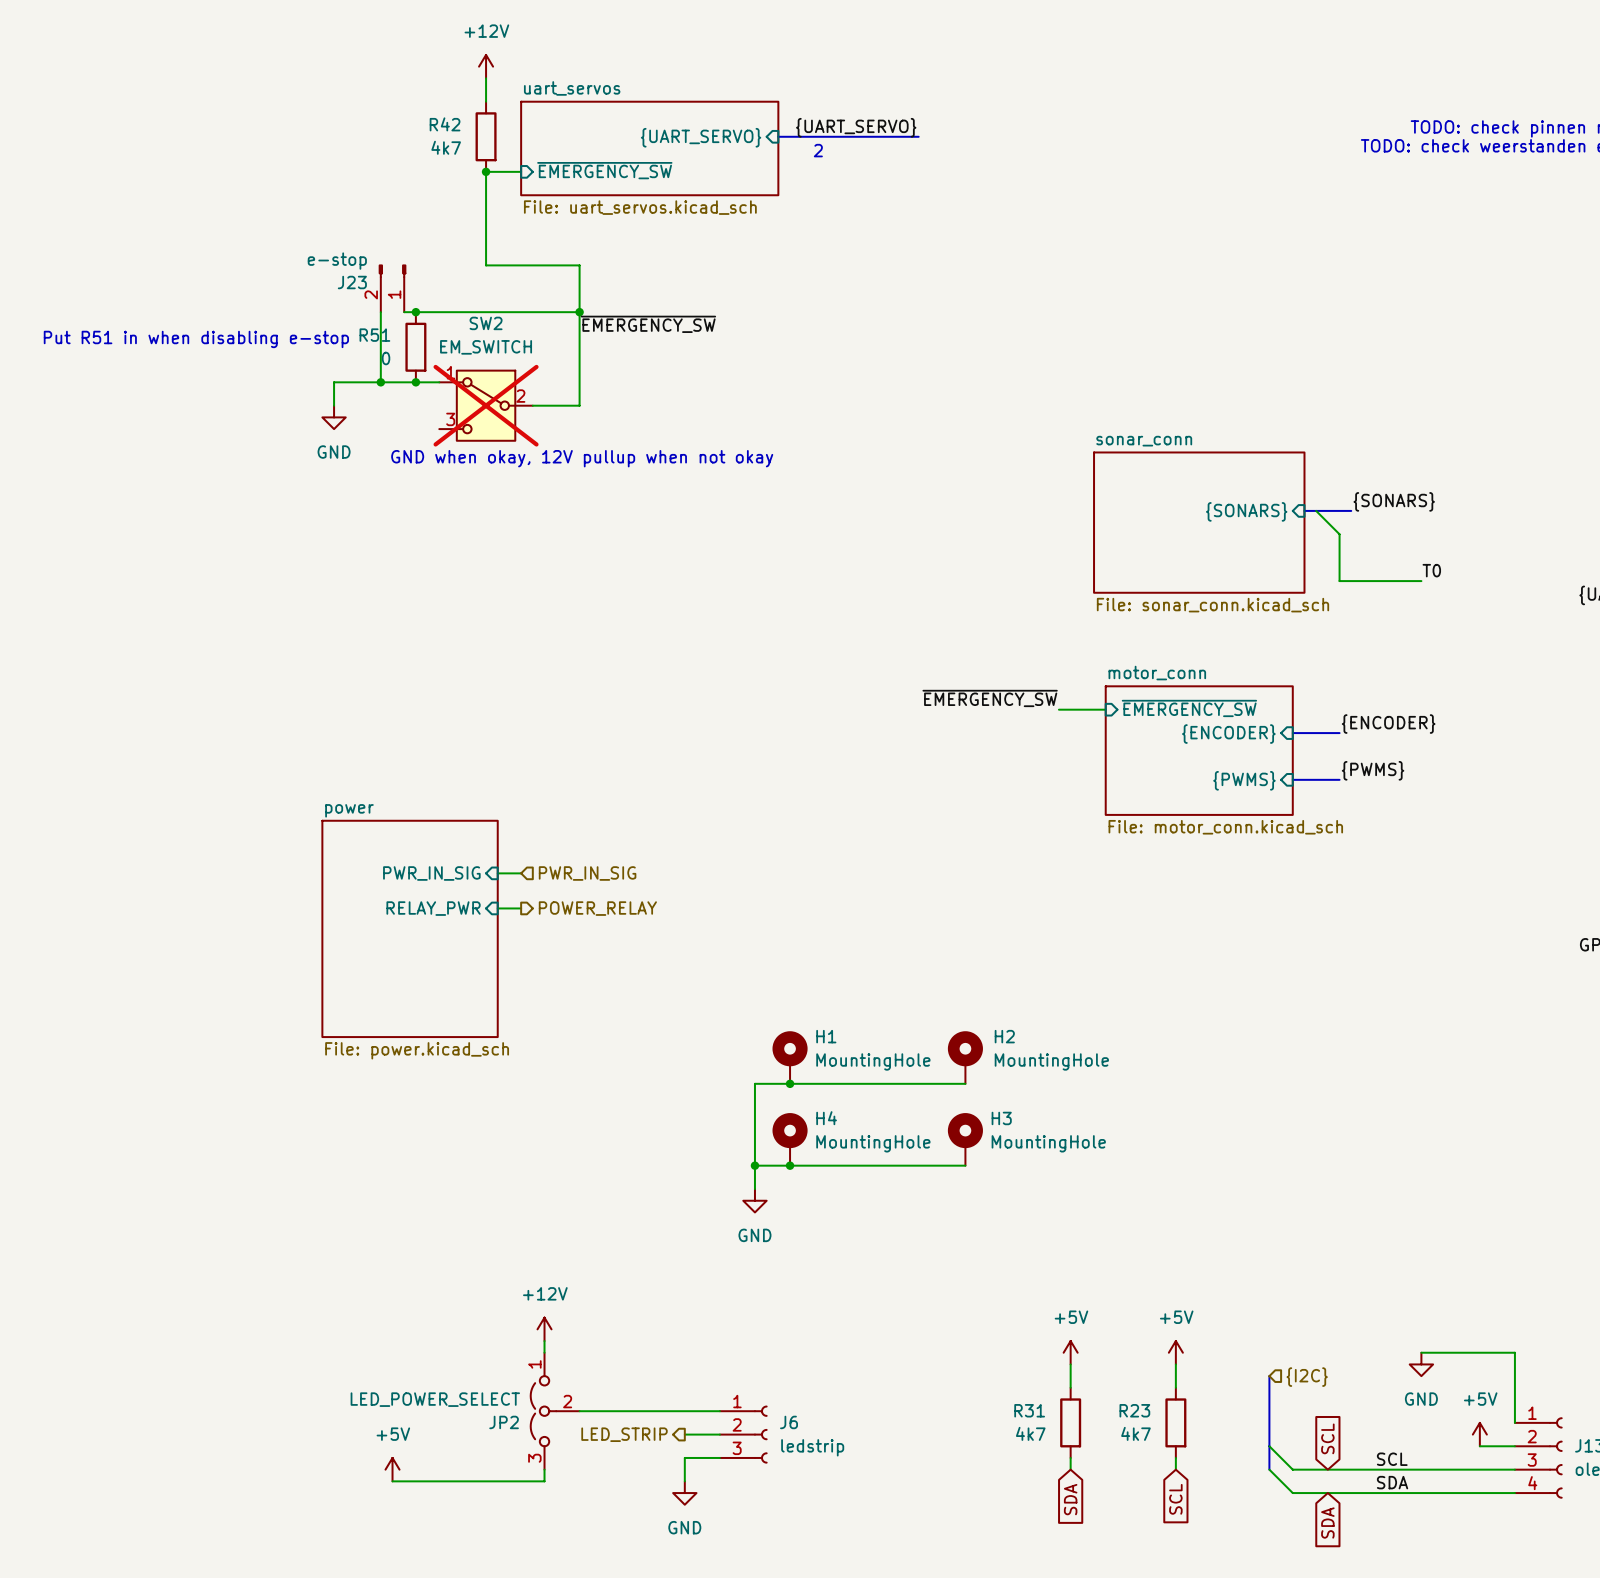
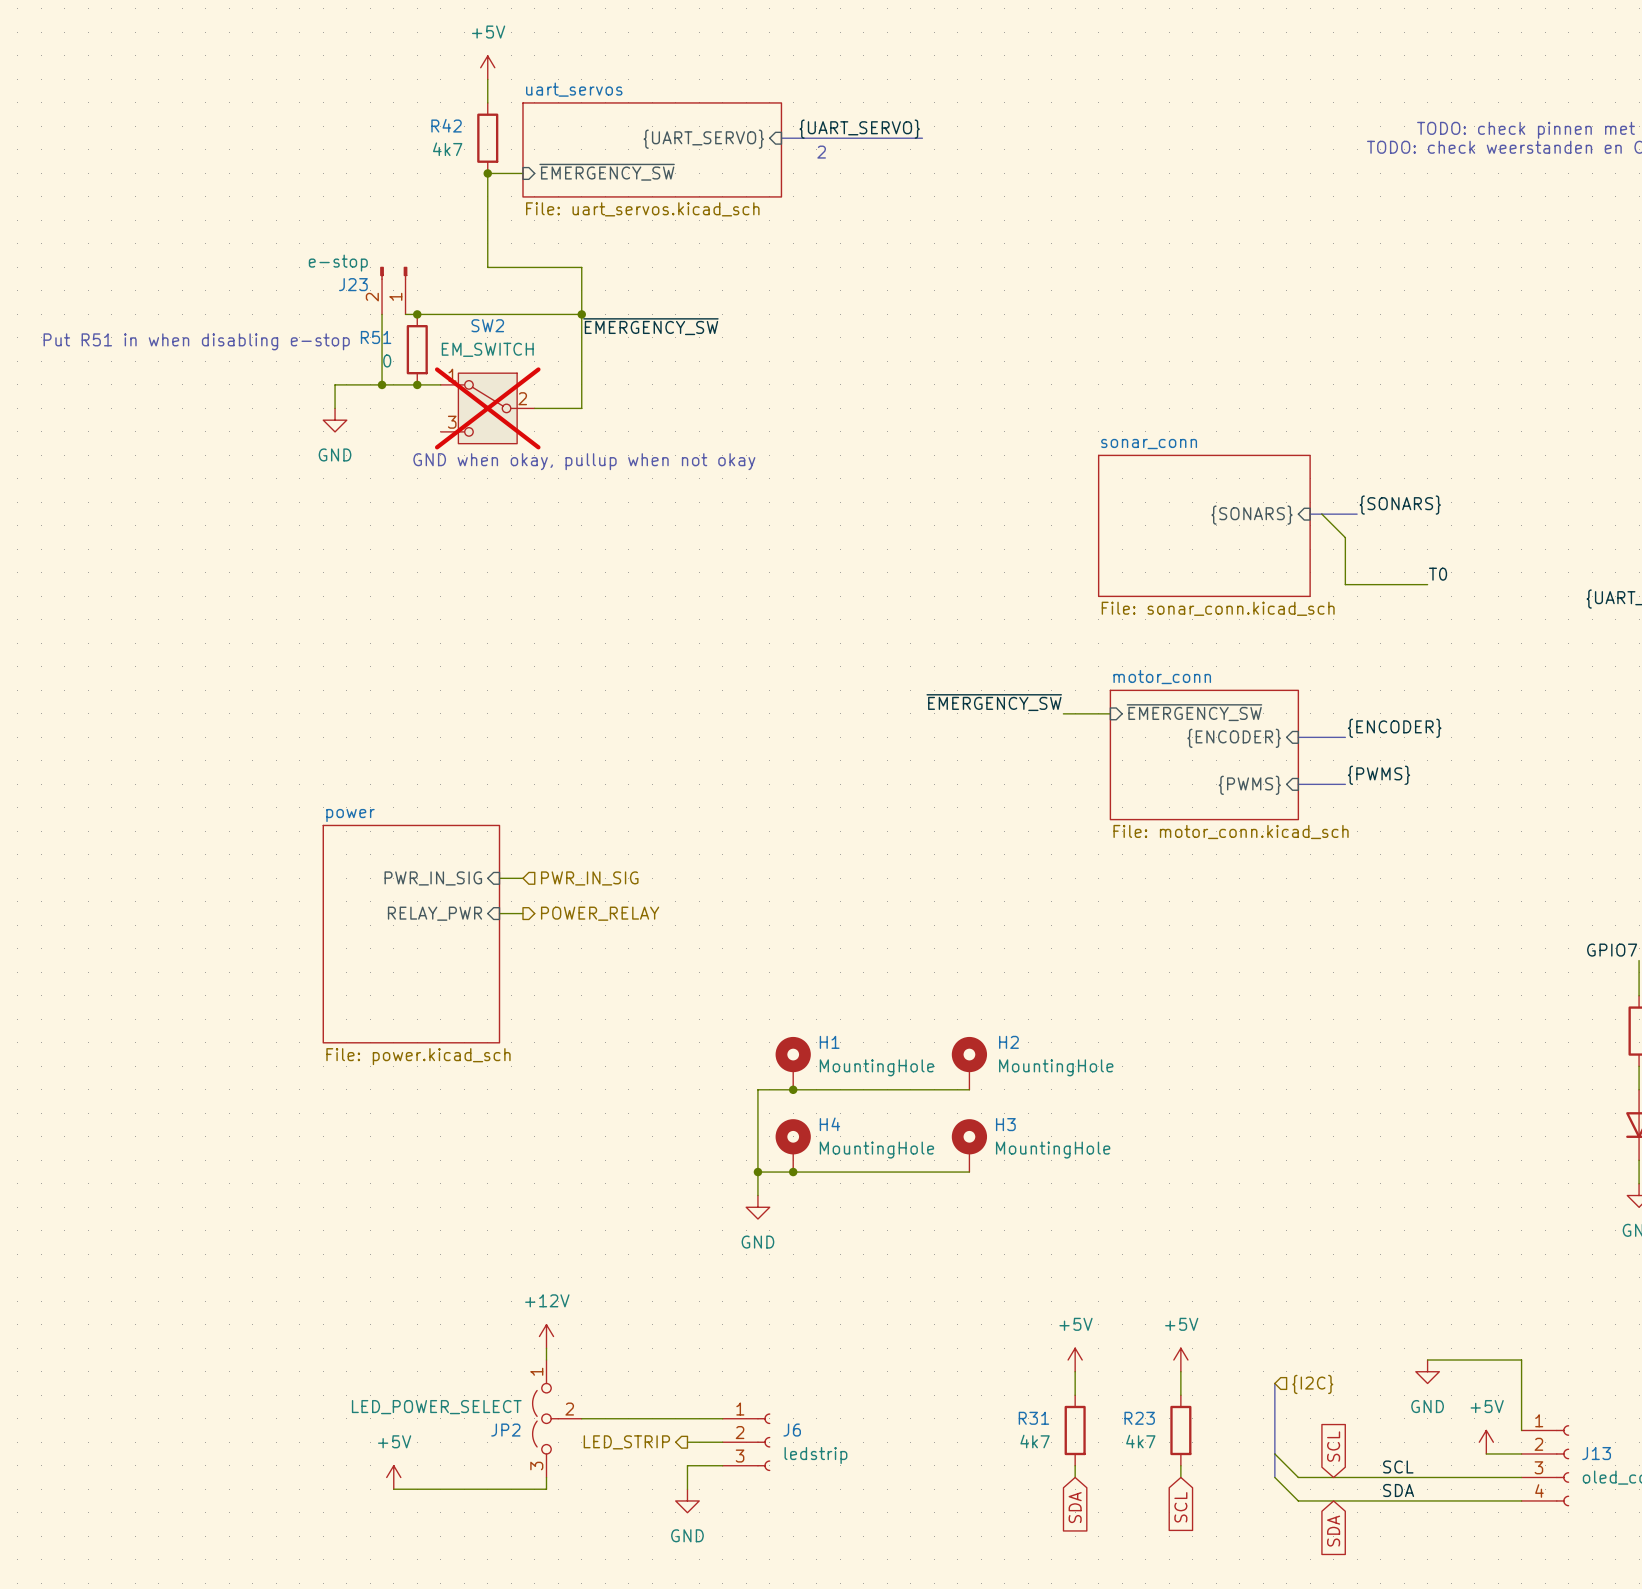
power symbol: +12V (486, 66) -> +5V (487, 67)
text: GND when okay, 12V pullup when not okay (582, 458) -> GND when okay, pullup when not okay (584, 461)

